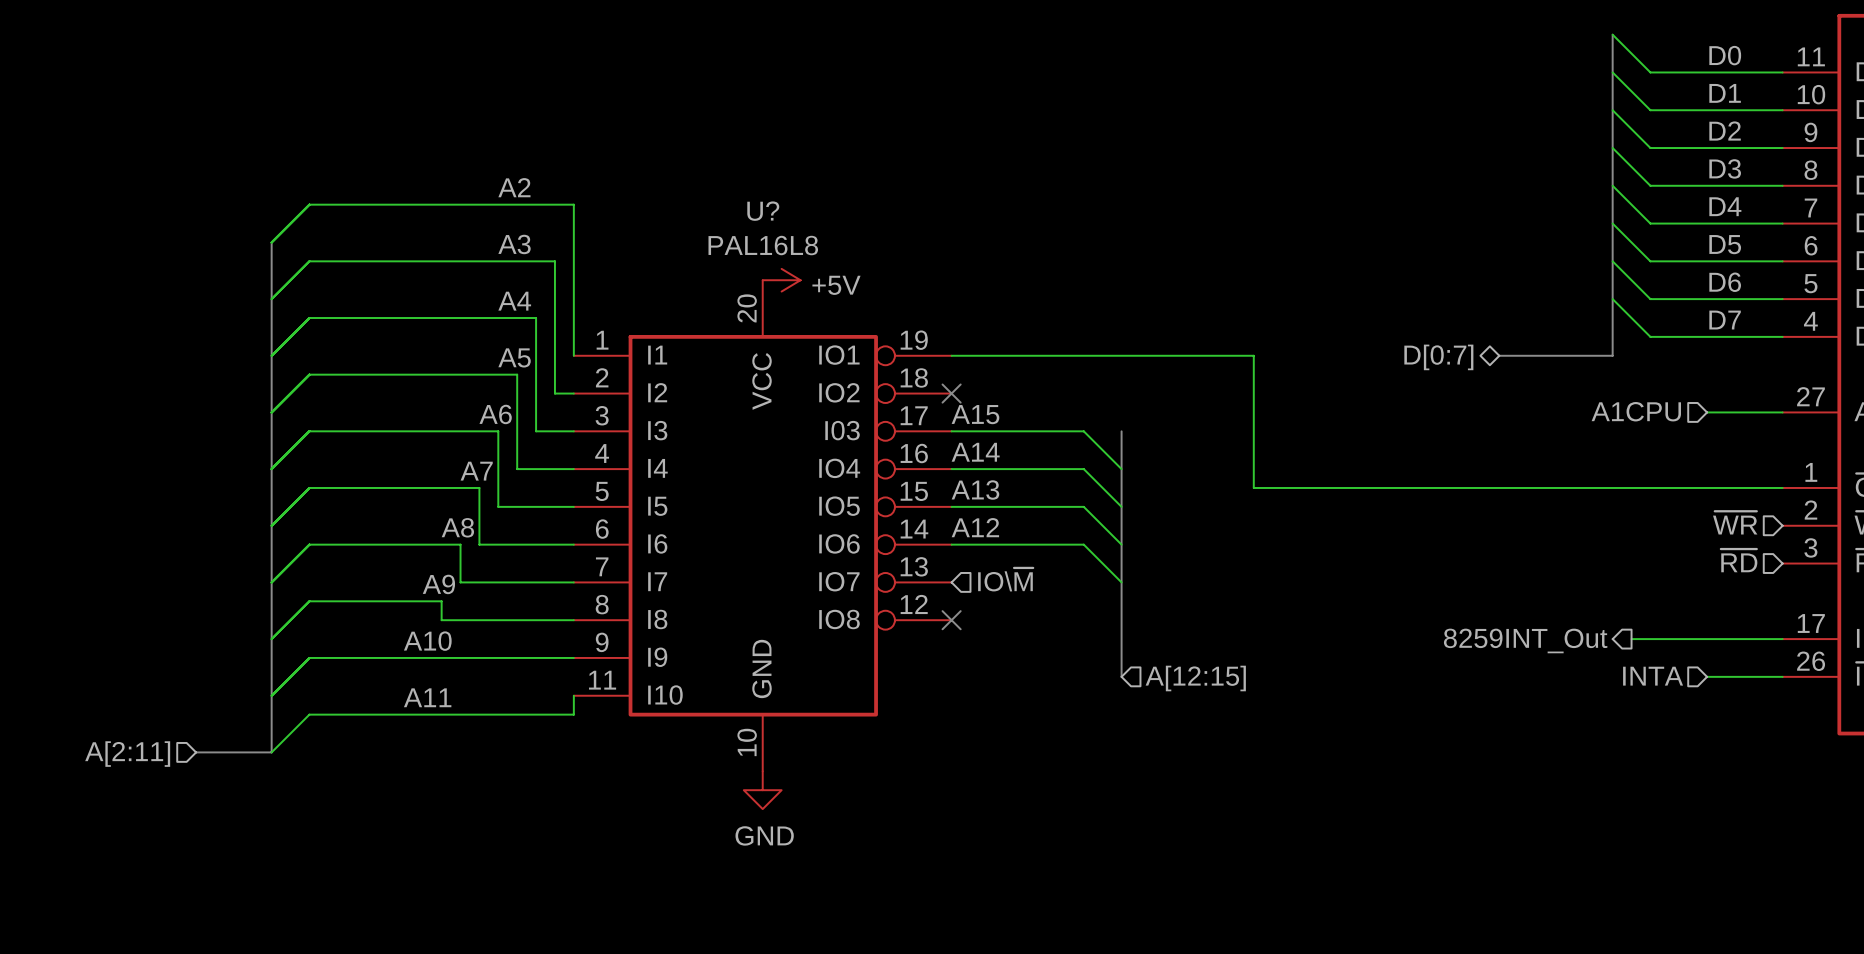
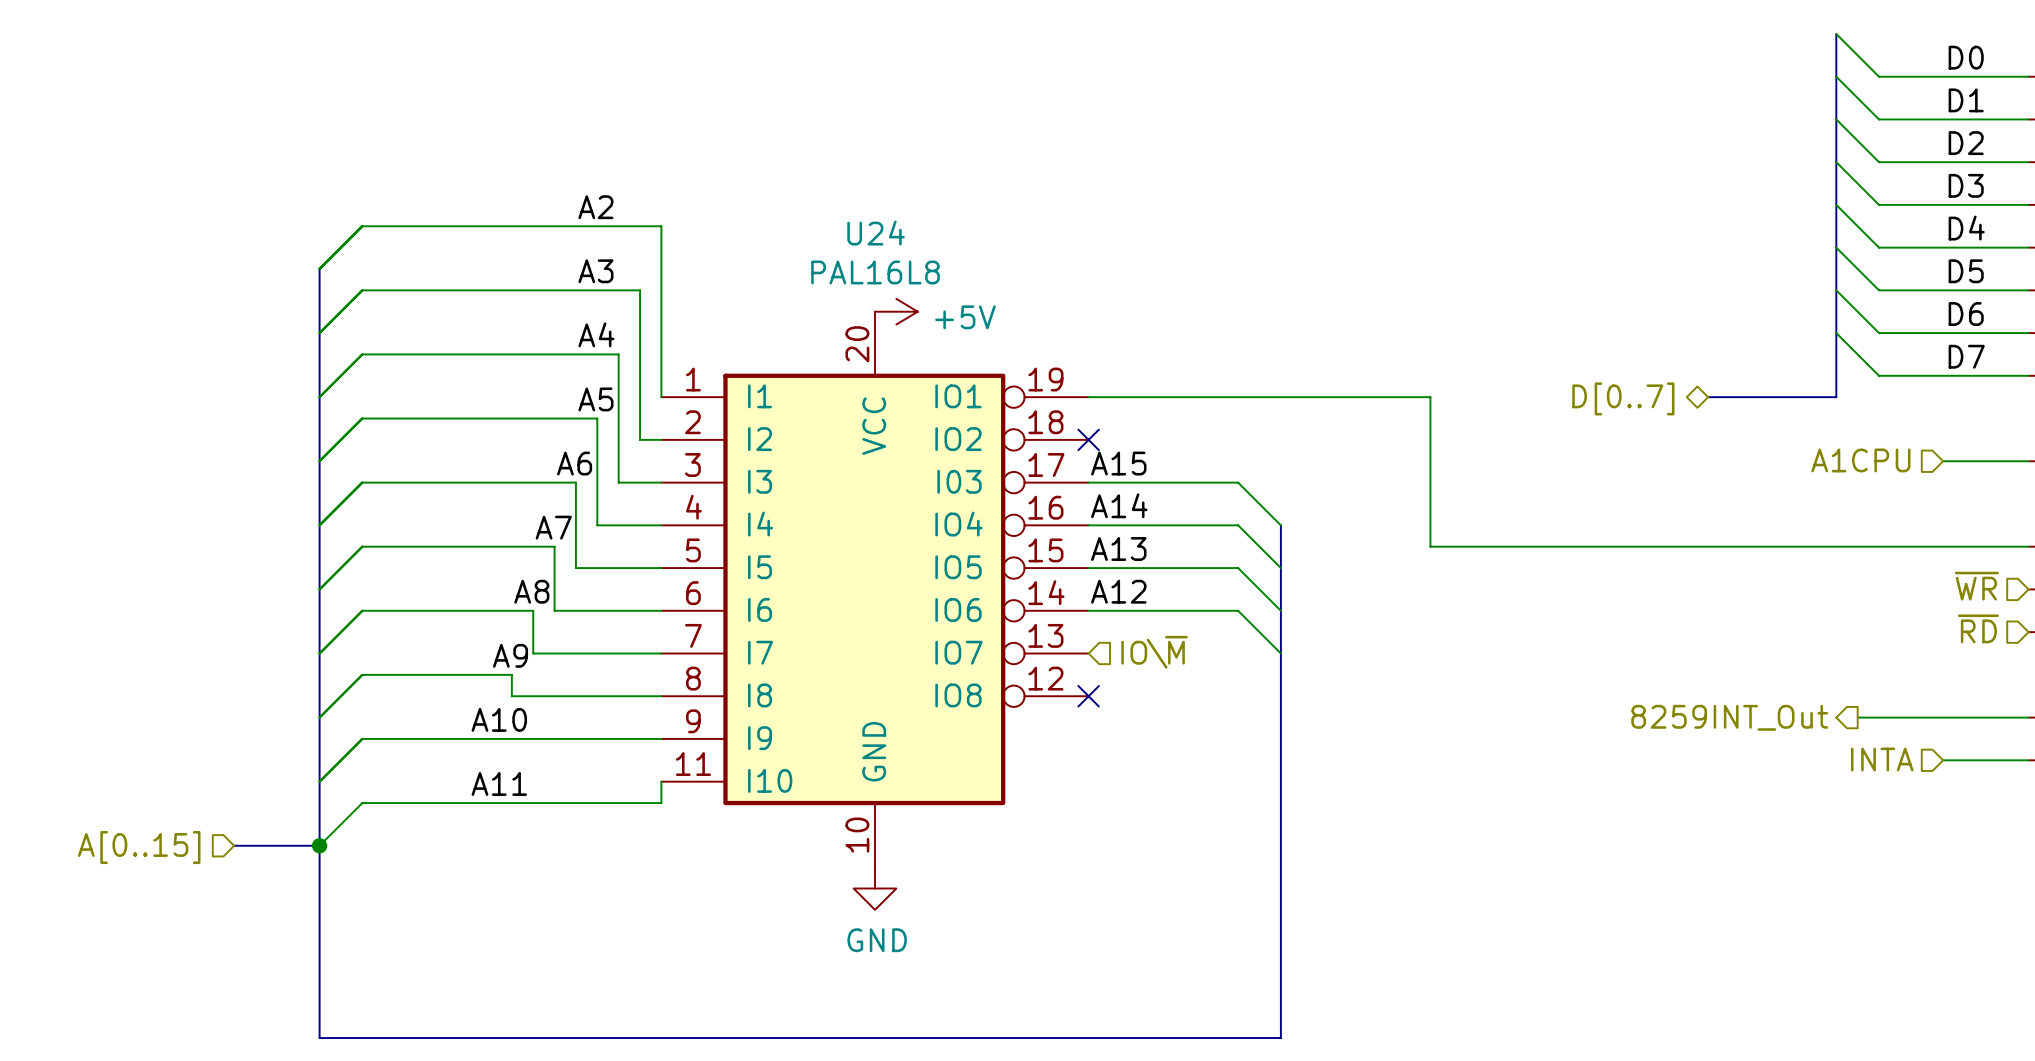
U? name: U? (763, 211) -> U24 (876, 233)
hierarchical label: D[0:7] (1438, 357) -> D[0..7] (1623, 398)
bus: (1121, 431) (1121, 469) -> none
bus: none -> (1280, 760) (1280, 1038) (319, 1038) (319, 845)
hierarchical label: A[12:15] (1195, 678) -> none
junction: none -> (319, 845)
hierarchical label: A[2:11] (127, 754) -> A[0..15] (139, 847)

